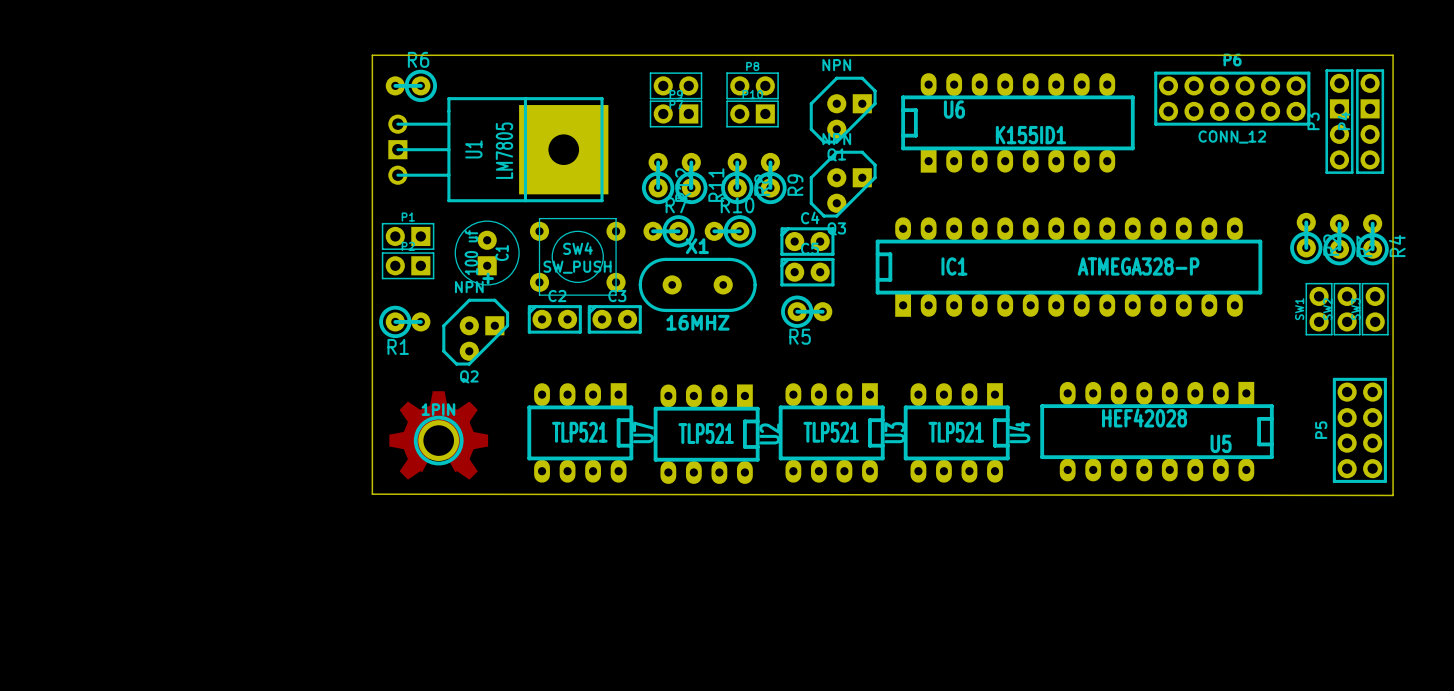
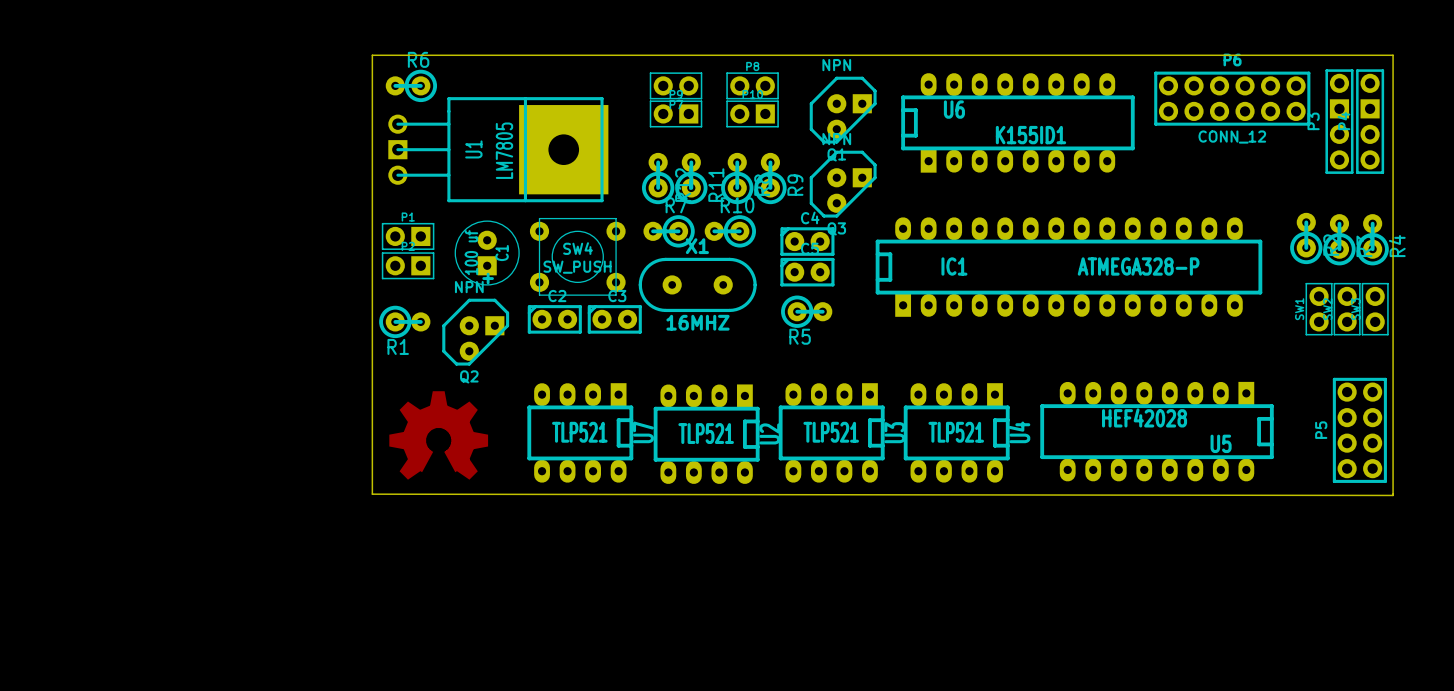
1PIN: (438, 440) -> none

